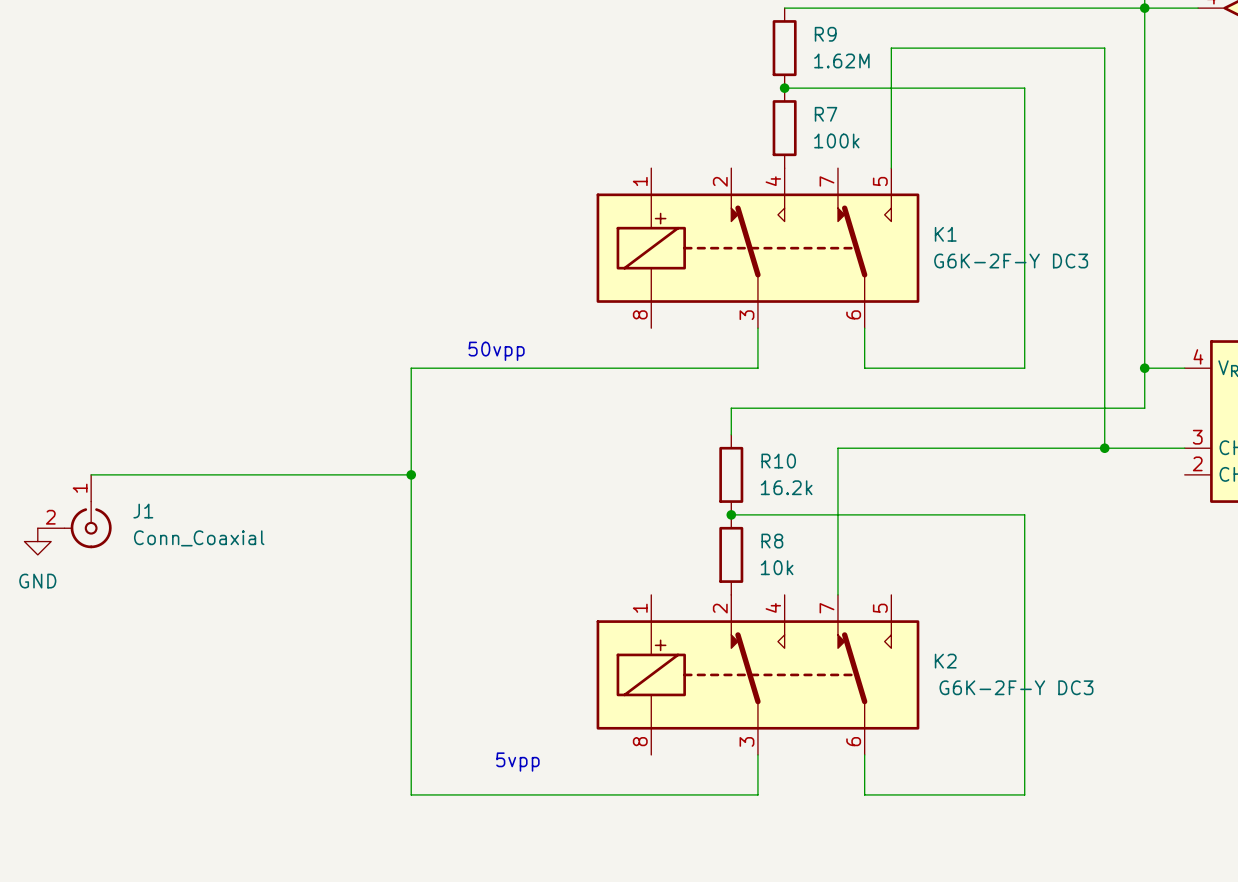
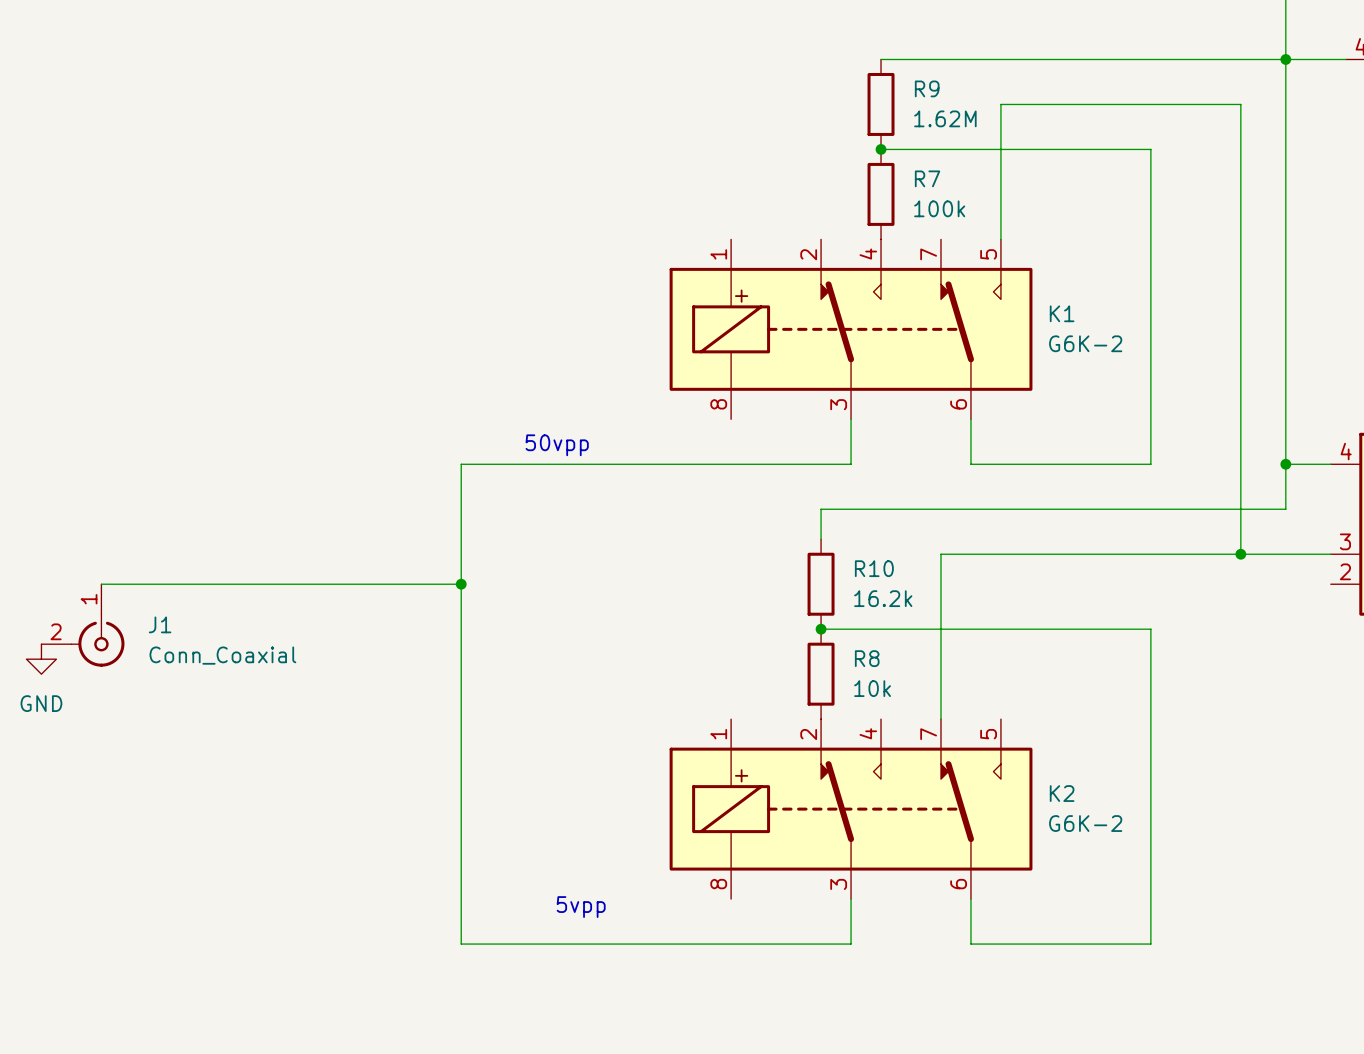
K1 value: G6K-2F-Y DC3 (1011, 261) -> G6K-2 (1085, 343)
K2 value: G6K-2F-Y DC3 (1016, 687) -> G6K-2 (1085, 823)

